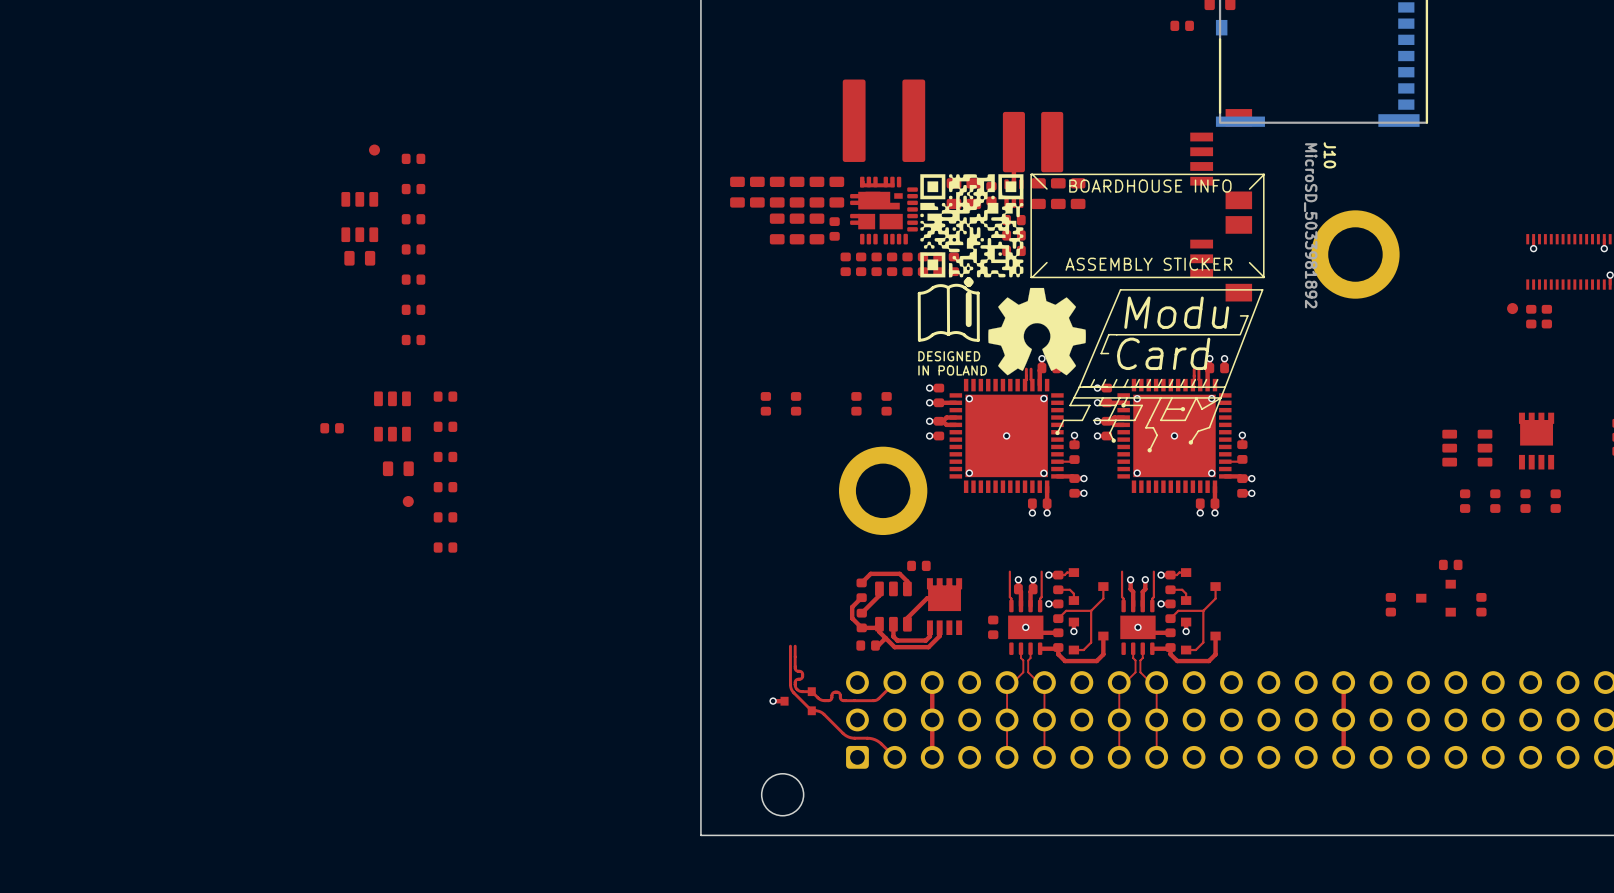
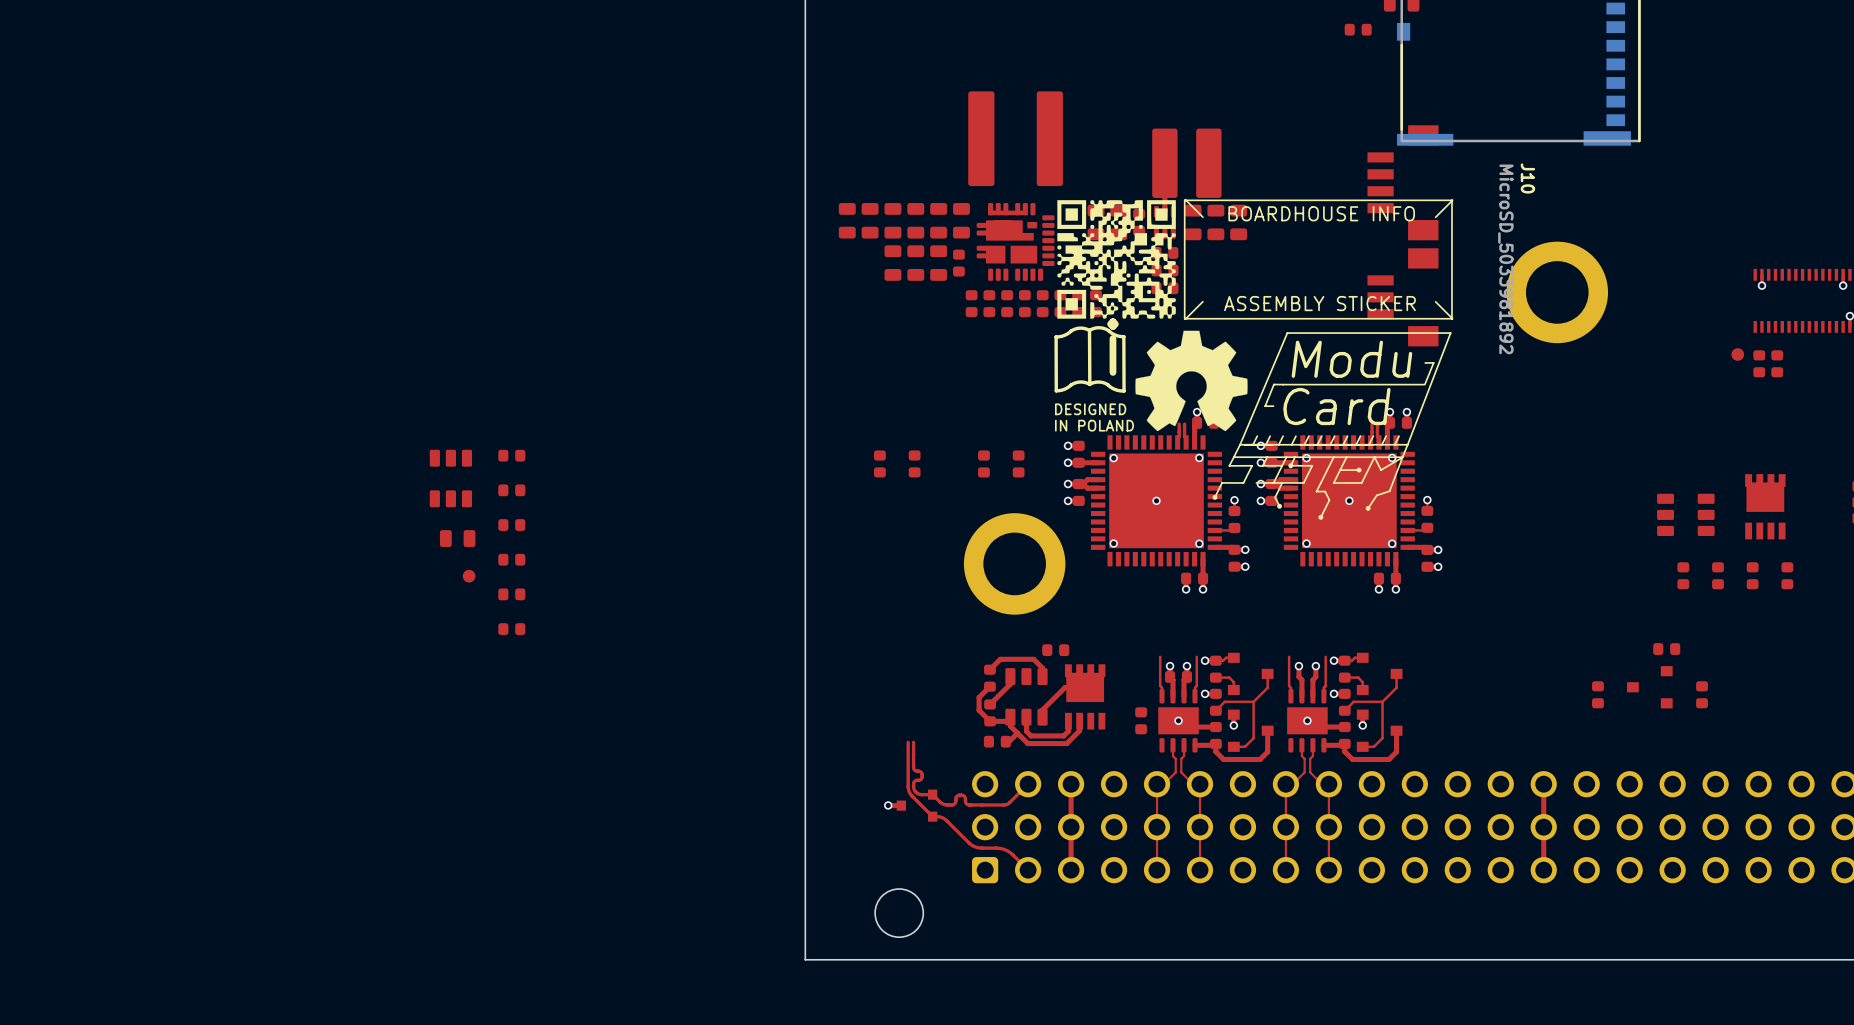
part: (374, 150) -> none
part: (413, 158) -> none
part: (413, 189) -> none
part: (359, 217) -> none
part: (413, 219) -> none
part: (413, 249) -> none
part: (359, 258) -> none
part: (413, 279) -> none
part: (413, 309) -> none
part: (413, 339) -> none
part: (332, 428) -> none

